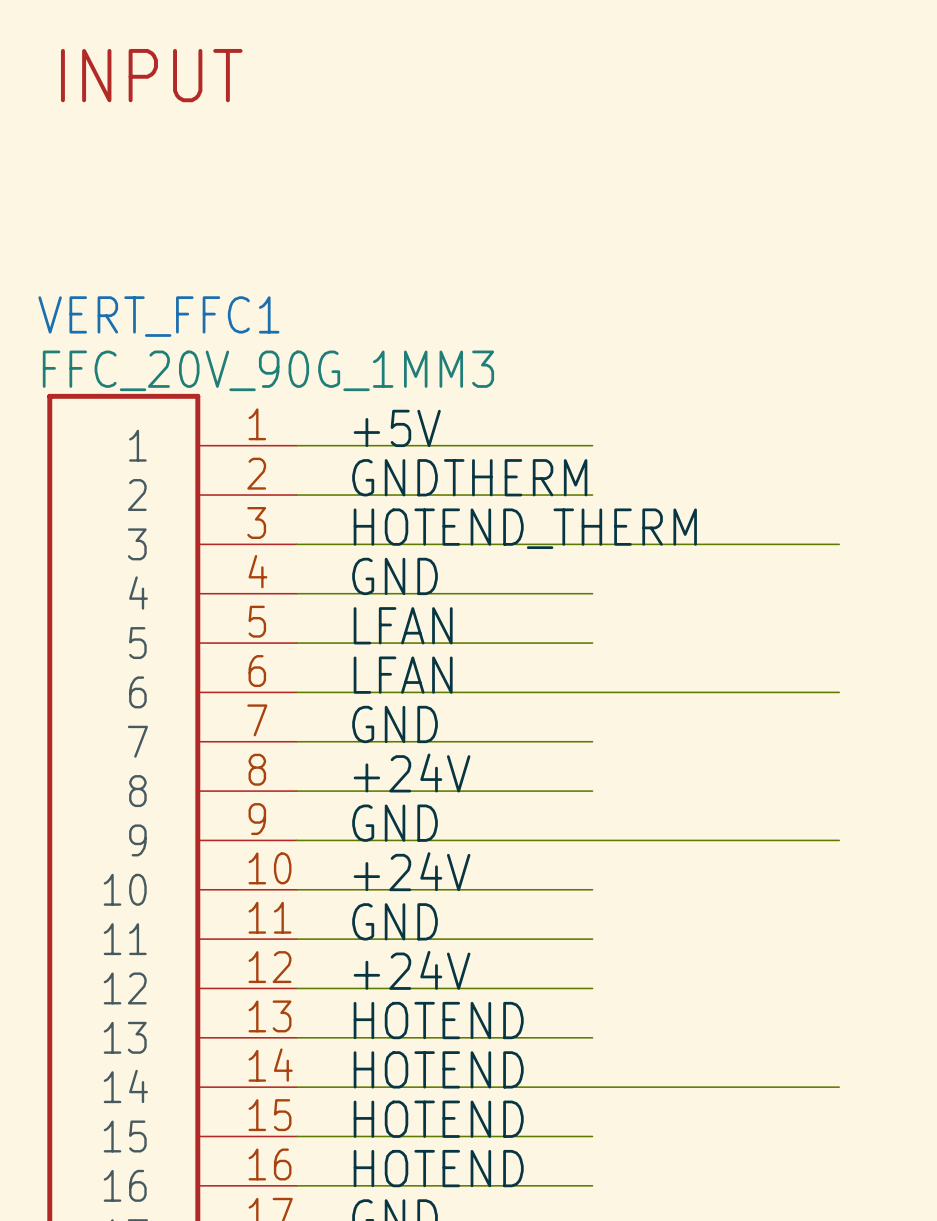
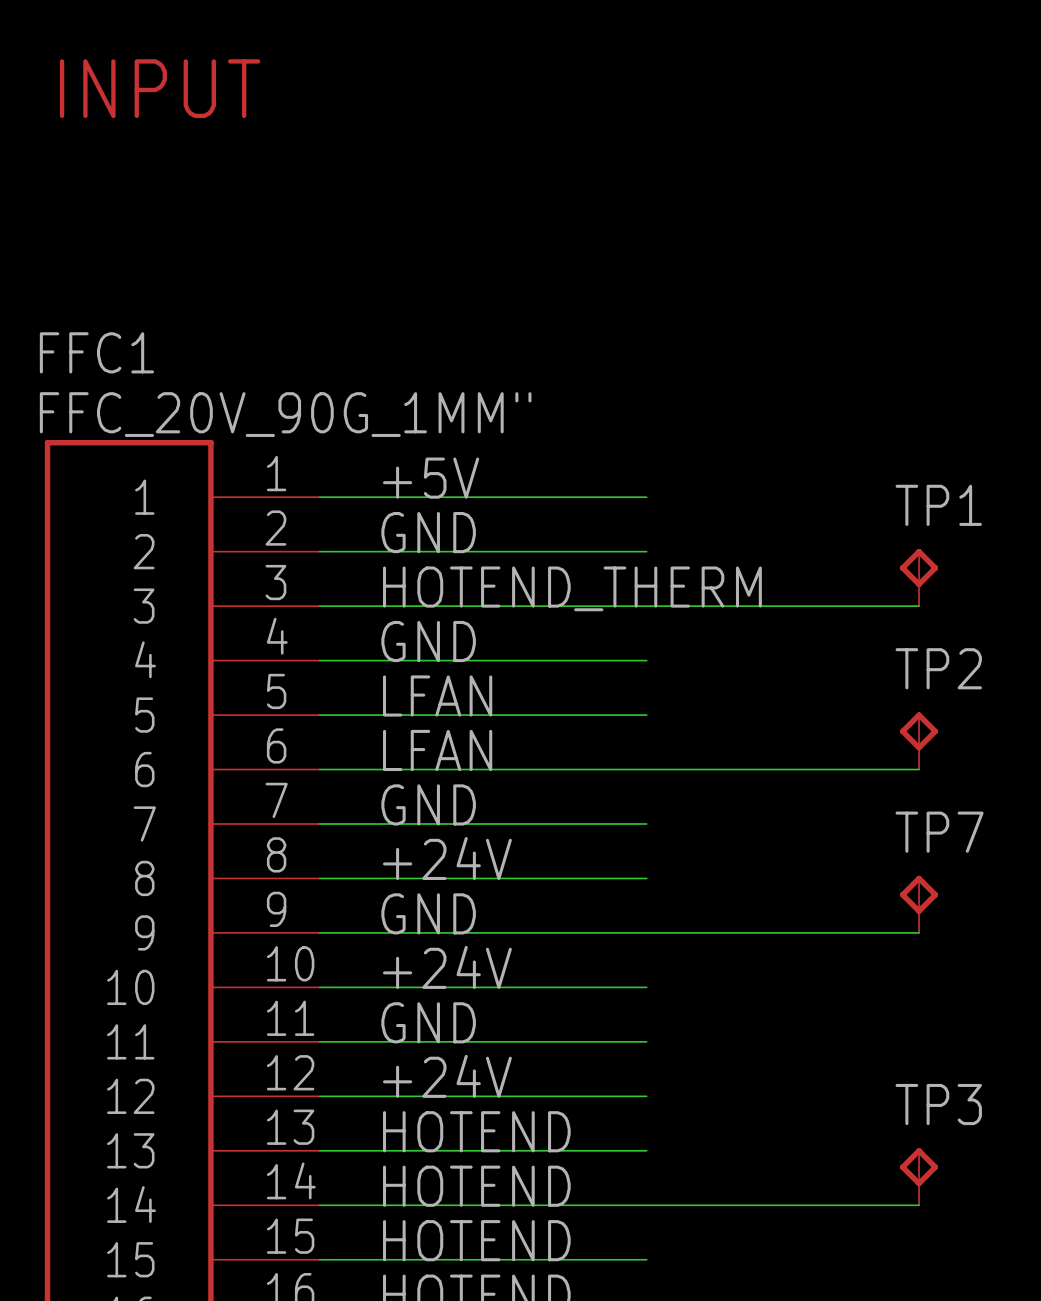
VERT_FFC1 name: VERT_FFC1 (158, 316) -> FFC1 (96, 352)
VERT_FFC1 value: FFC_20V_90G_1MM3 (268, 370) -> FFC_20V_90G_1MM" (285, 414)
label: GNDTHERM (469, 477) -> GND (428, 532)
TP1: none -> (919, 577)
TP2: none -> (919, 740)
TP7: none -> (919, 904)
TP3: none -> (919, 1176)

